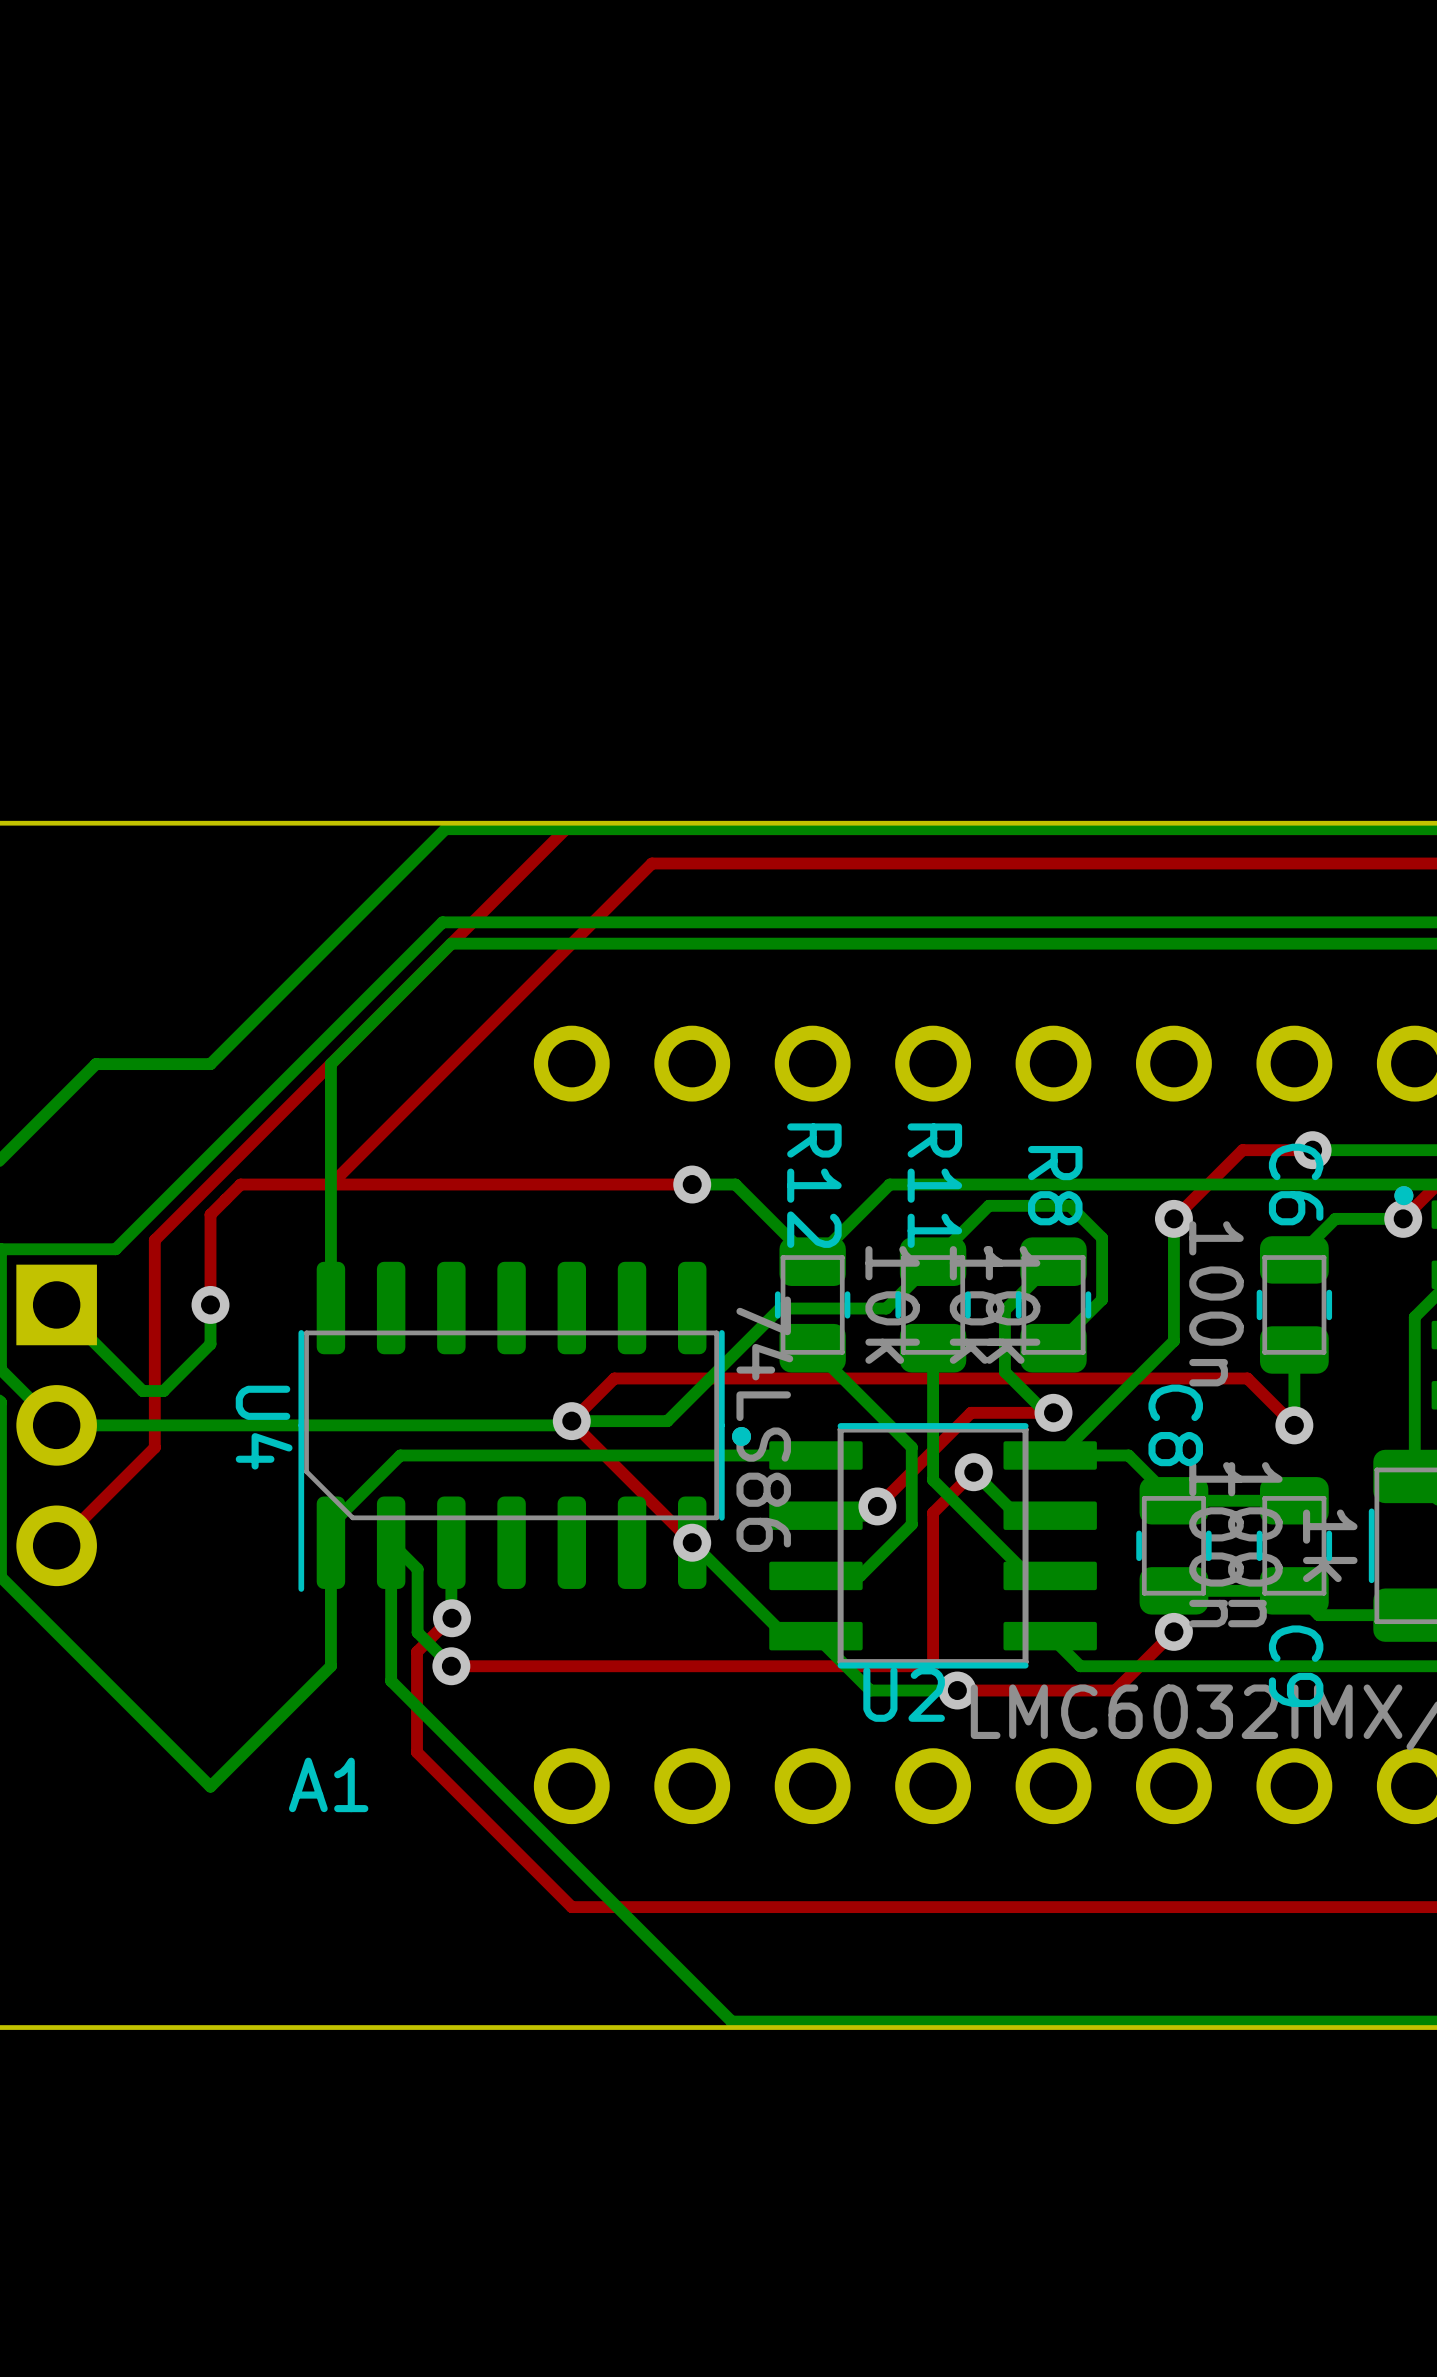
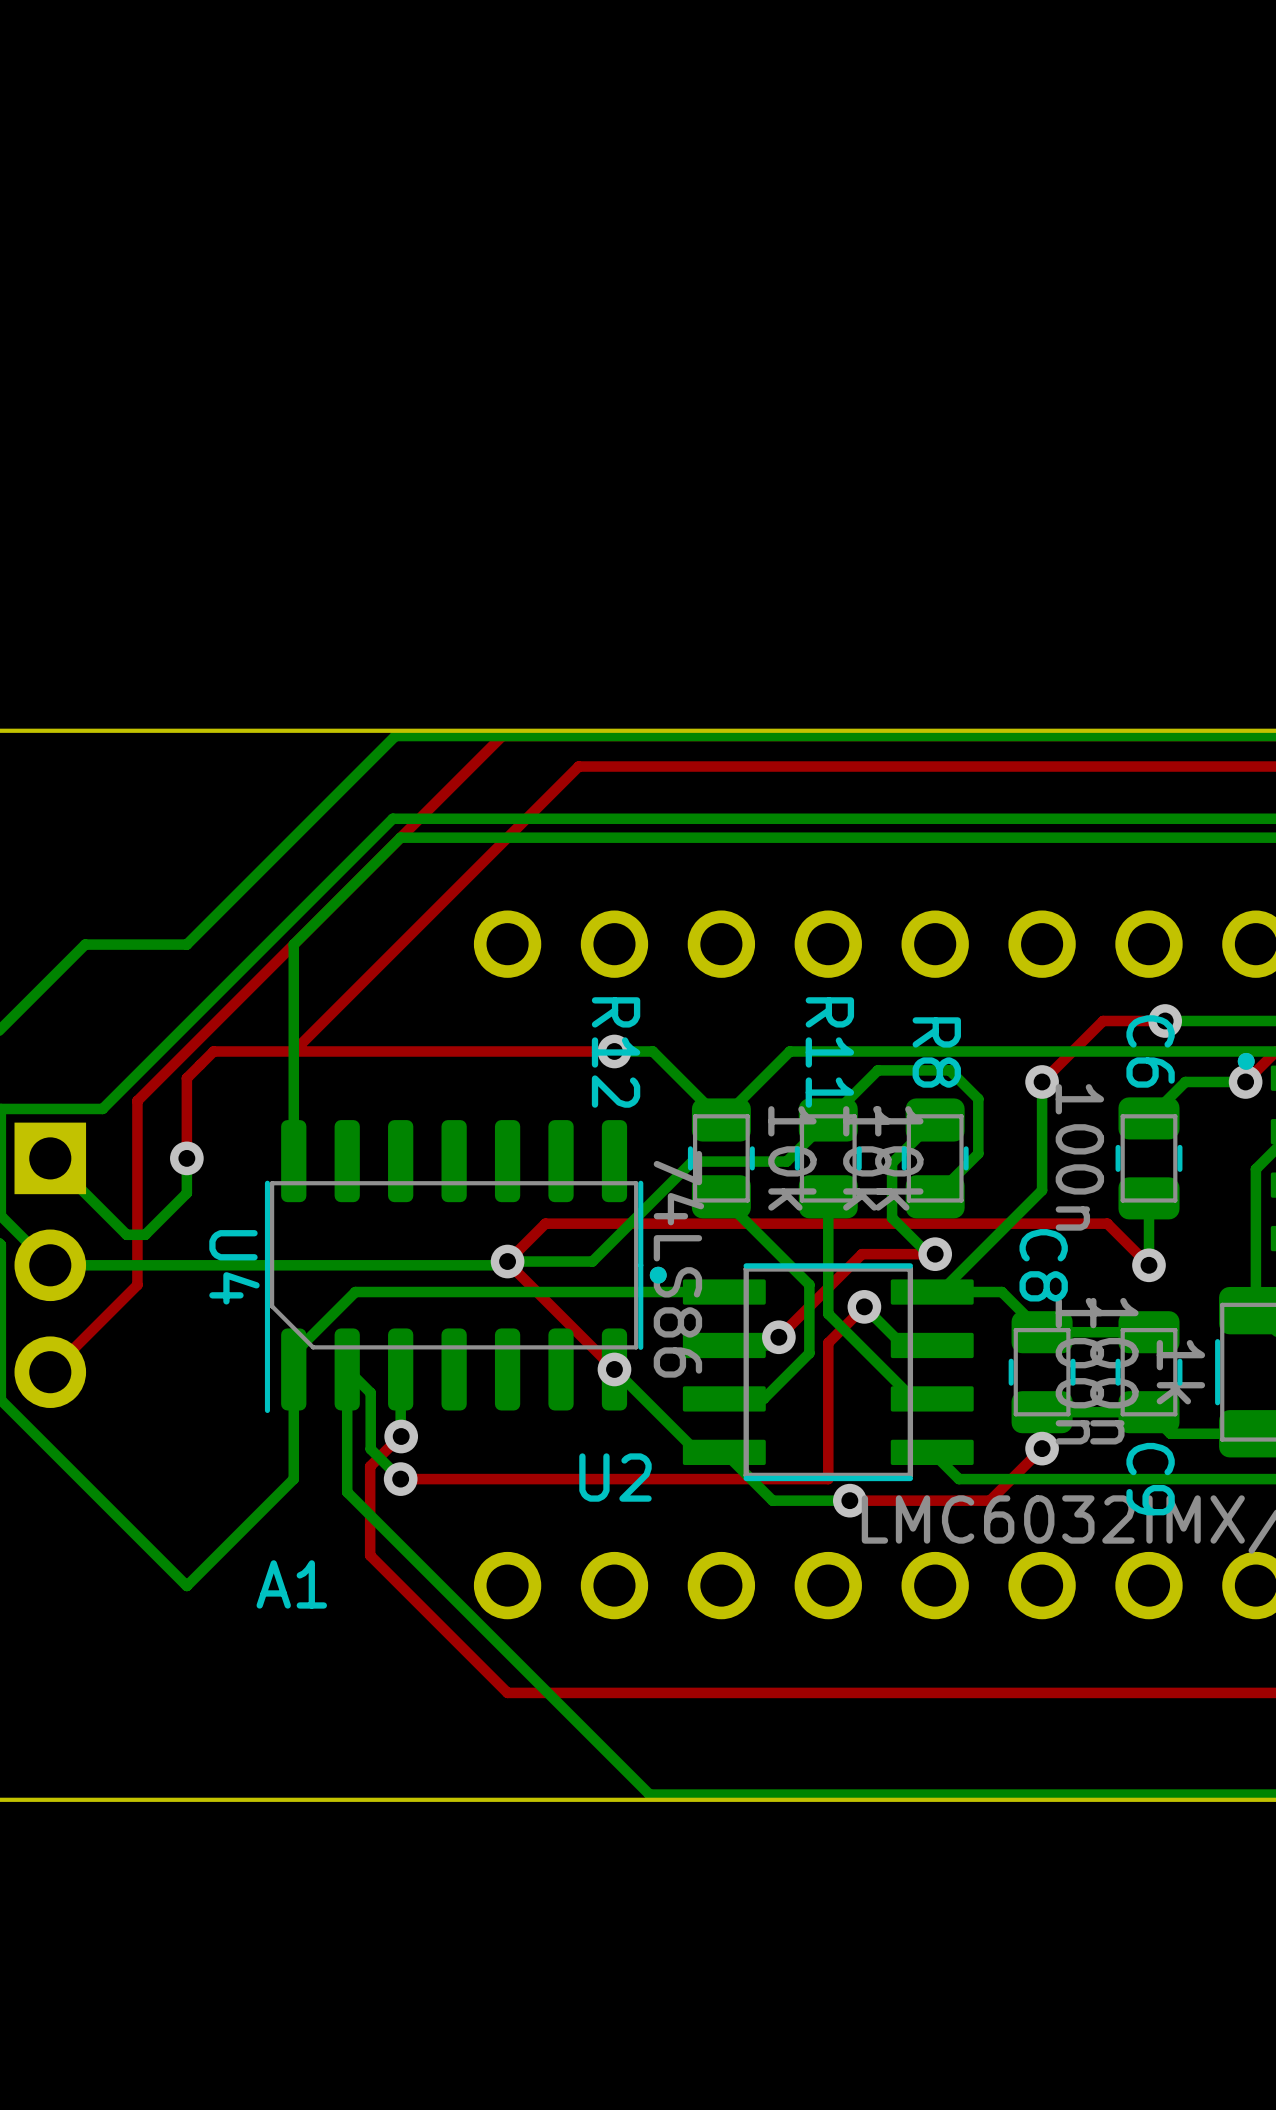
R12 name position: R12 (814, 1185) -> R12 (616, 1052)
U2 name position: U2 (904, 1694) -> U2 (615, 1477)

